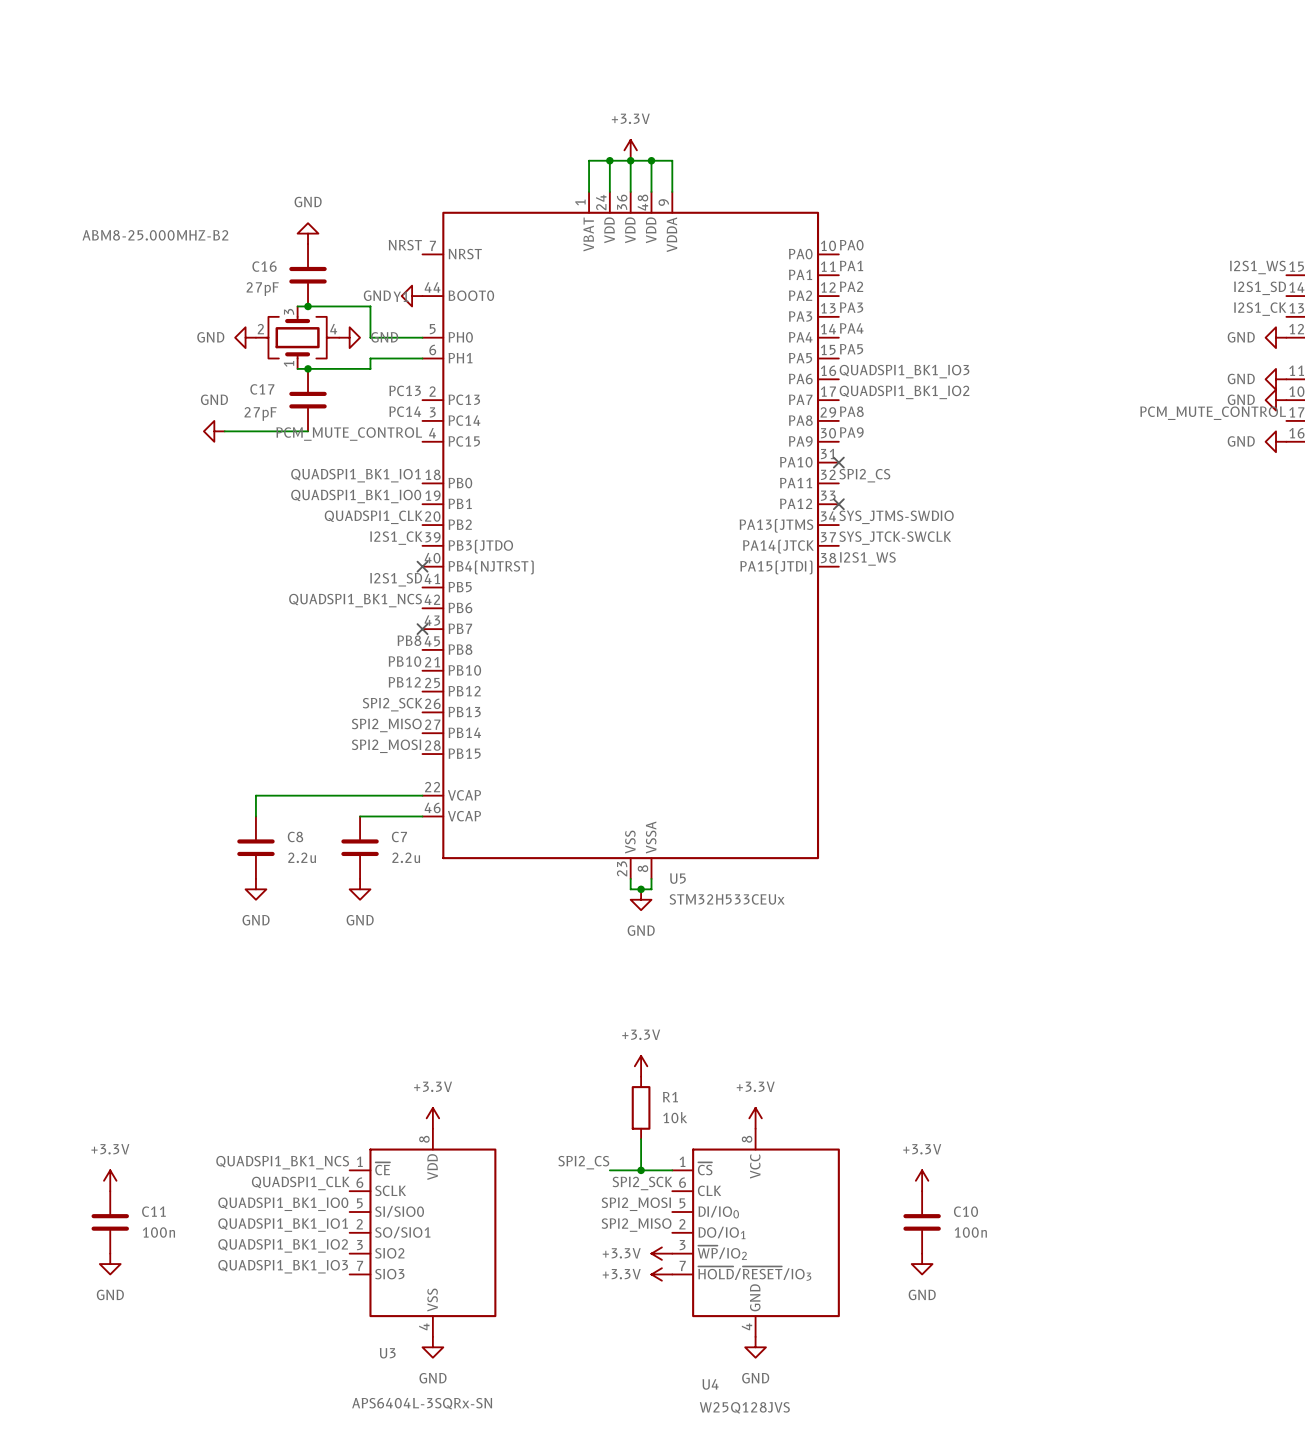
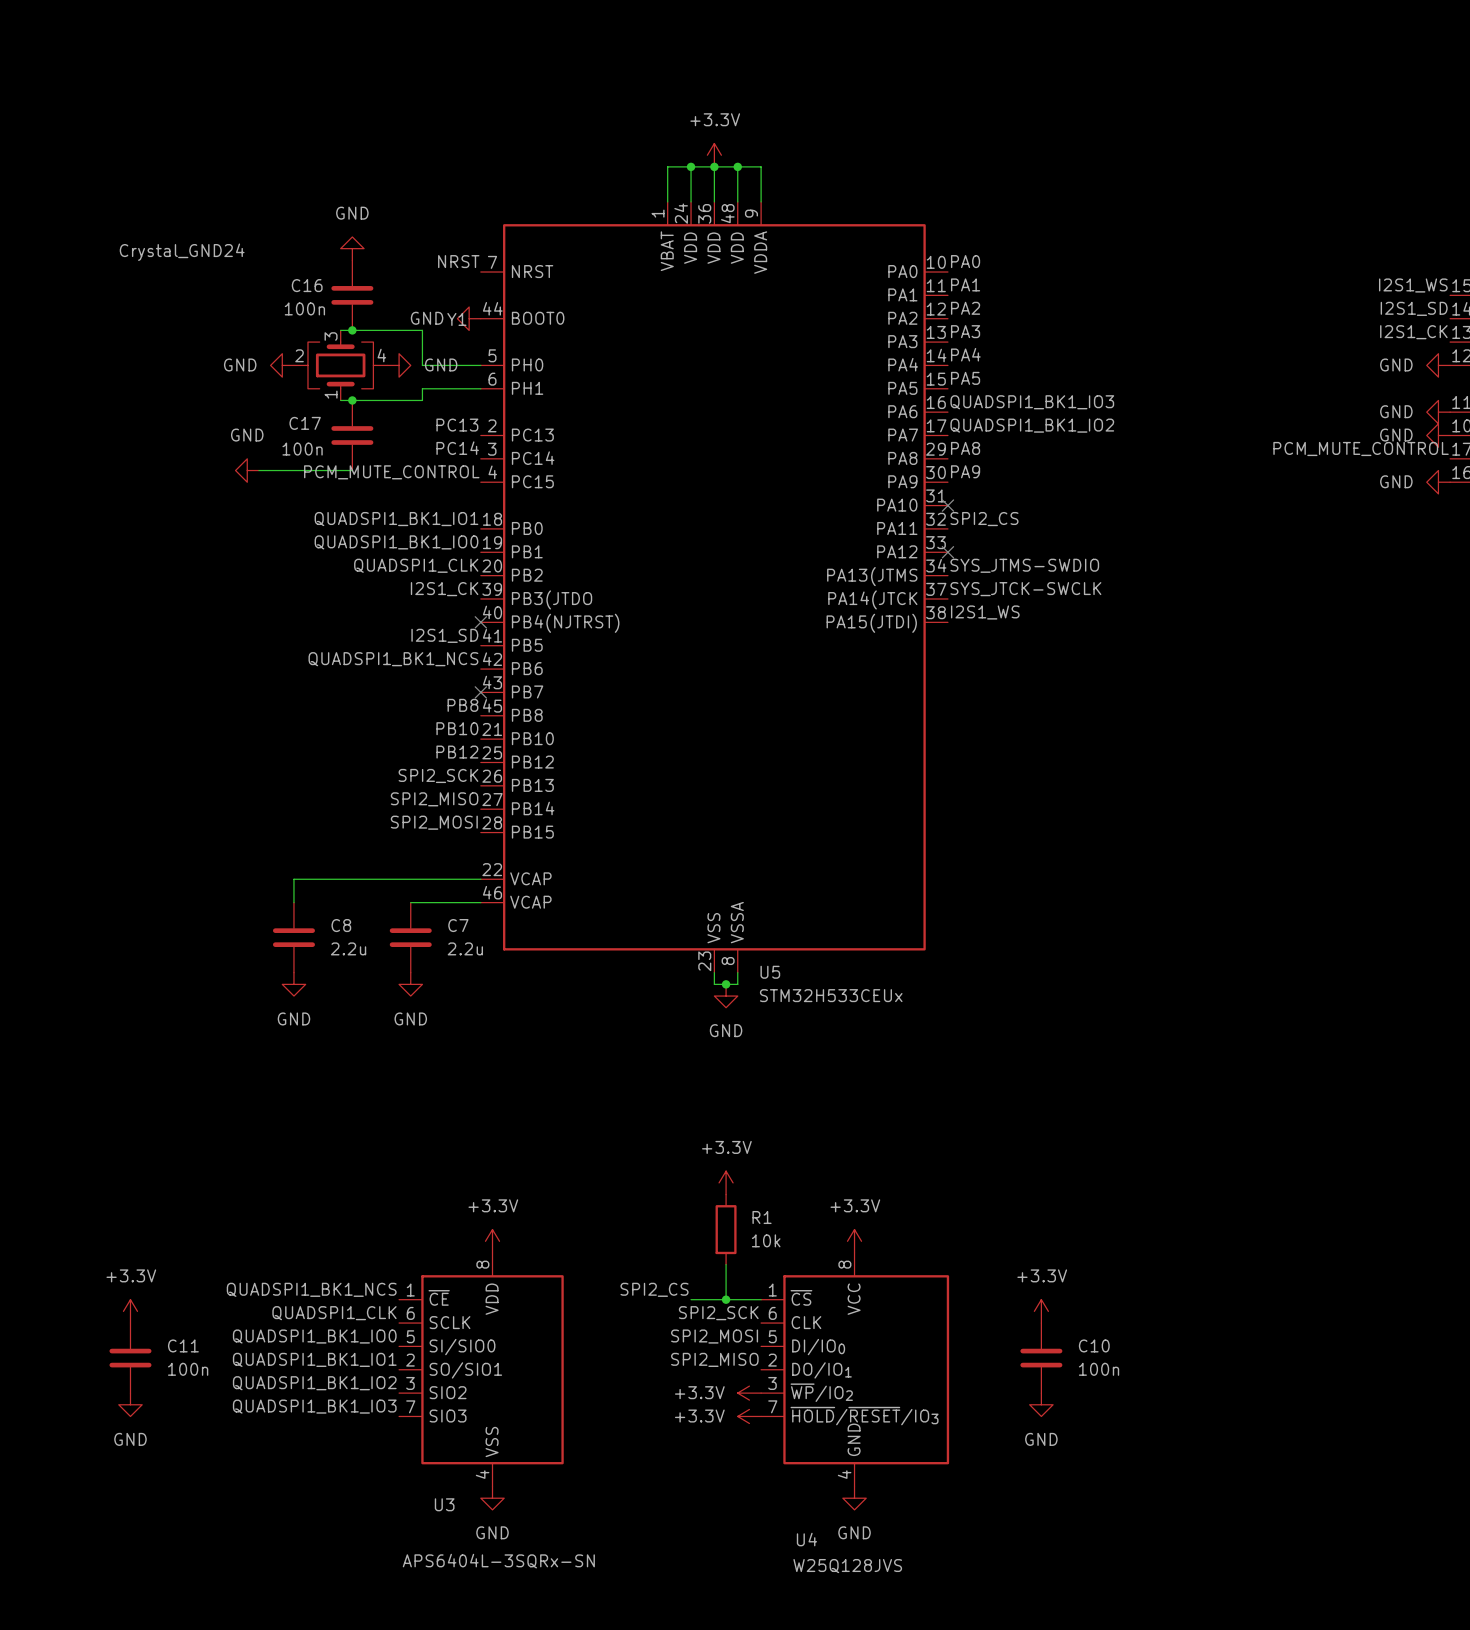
Y1 value: ABM8-25.000MHZ-B2 (155, 235) -> Crystal_GND24 (182, 252)
C16 value: 27pF (262, 289) -> 100n (304, 308)
C17 value: 27pF (260, 413) -> 100n (302, 449)

